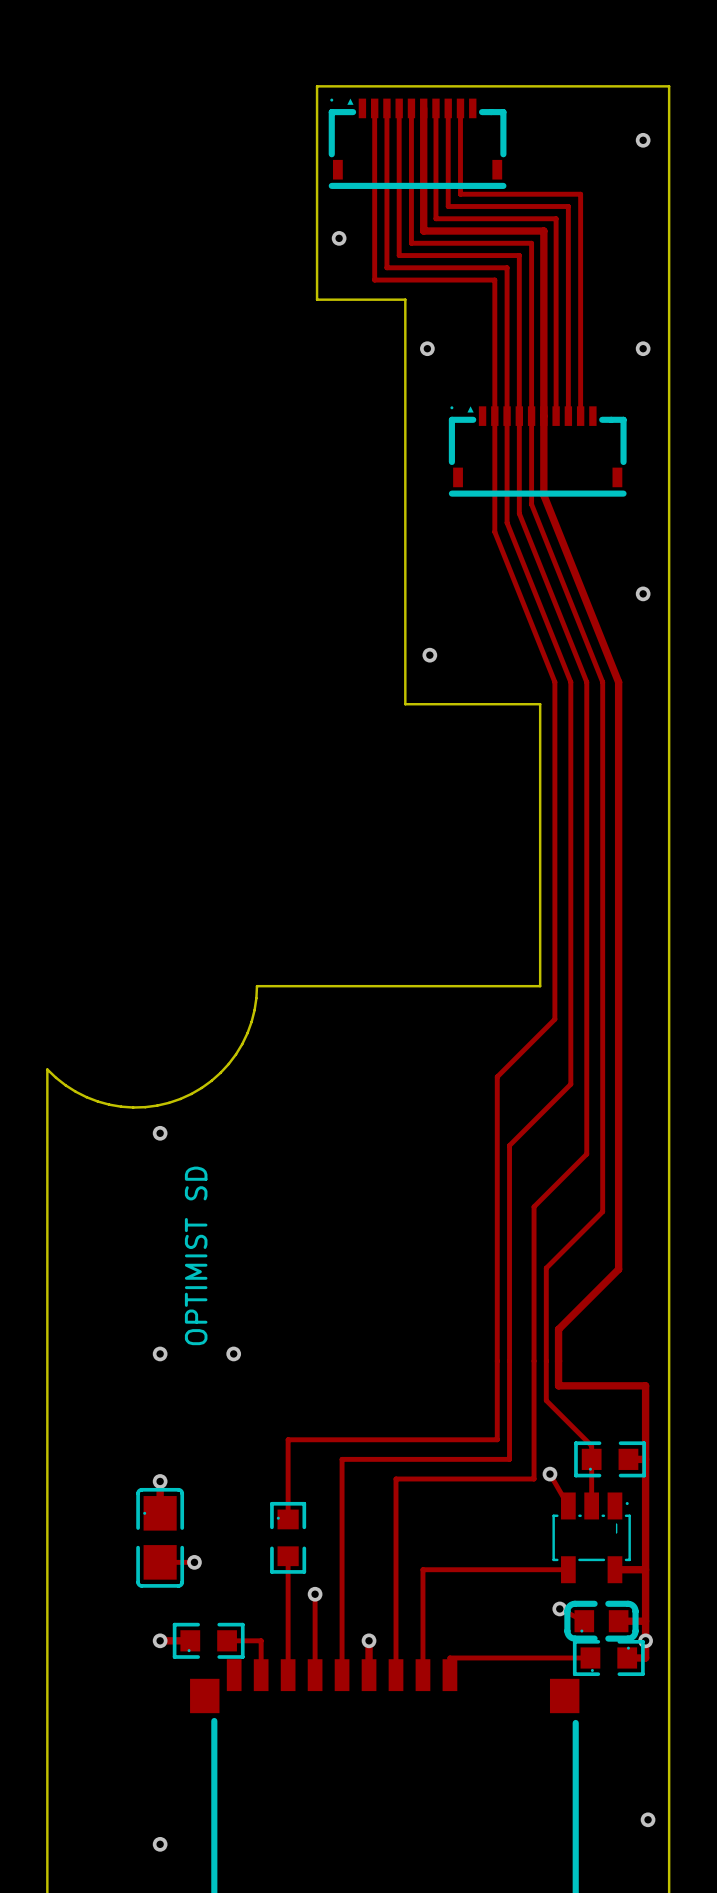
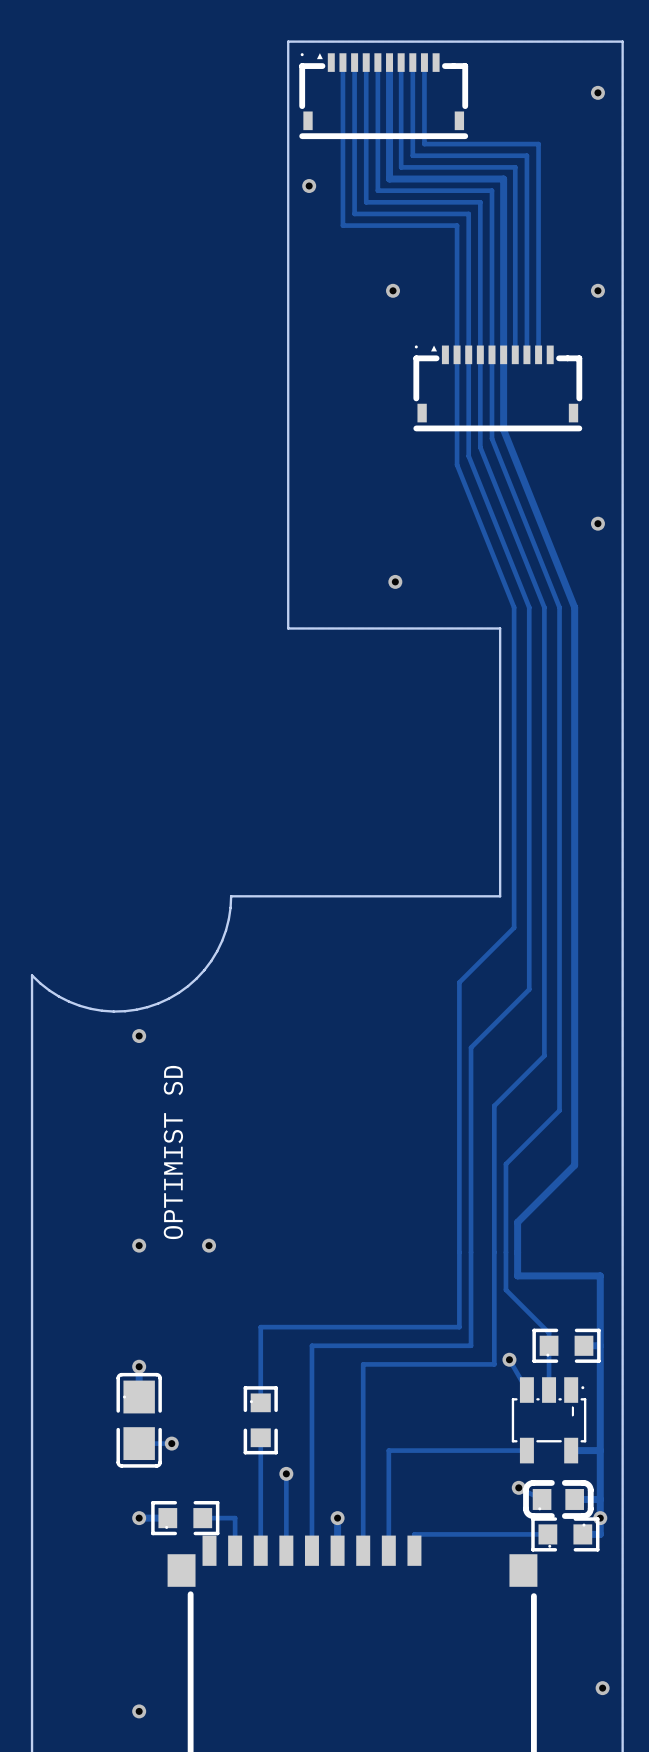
board edge: (317, 299) (405, 299) (405, 704) -> (288, 244) (288, 628) (372, 628)

